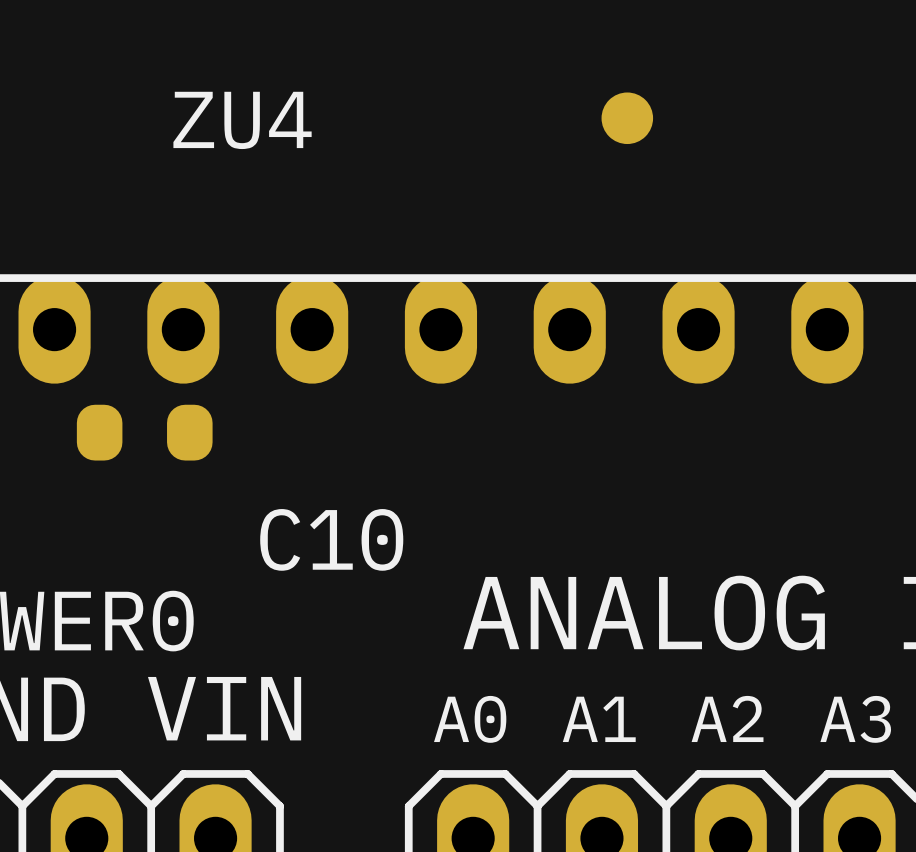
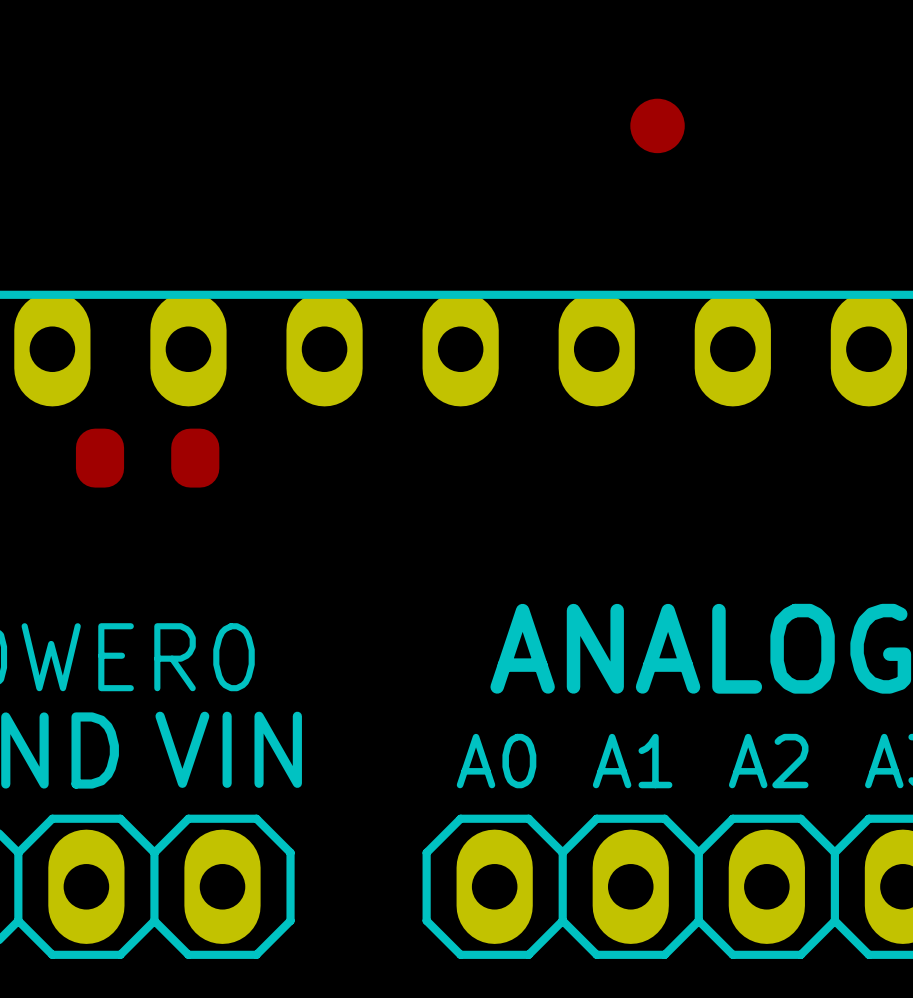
ZU4 name: ZU4 (242, 120) -> none
C10 name: C10 (331, 539) -> none

